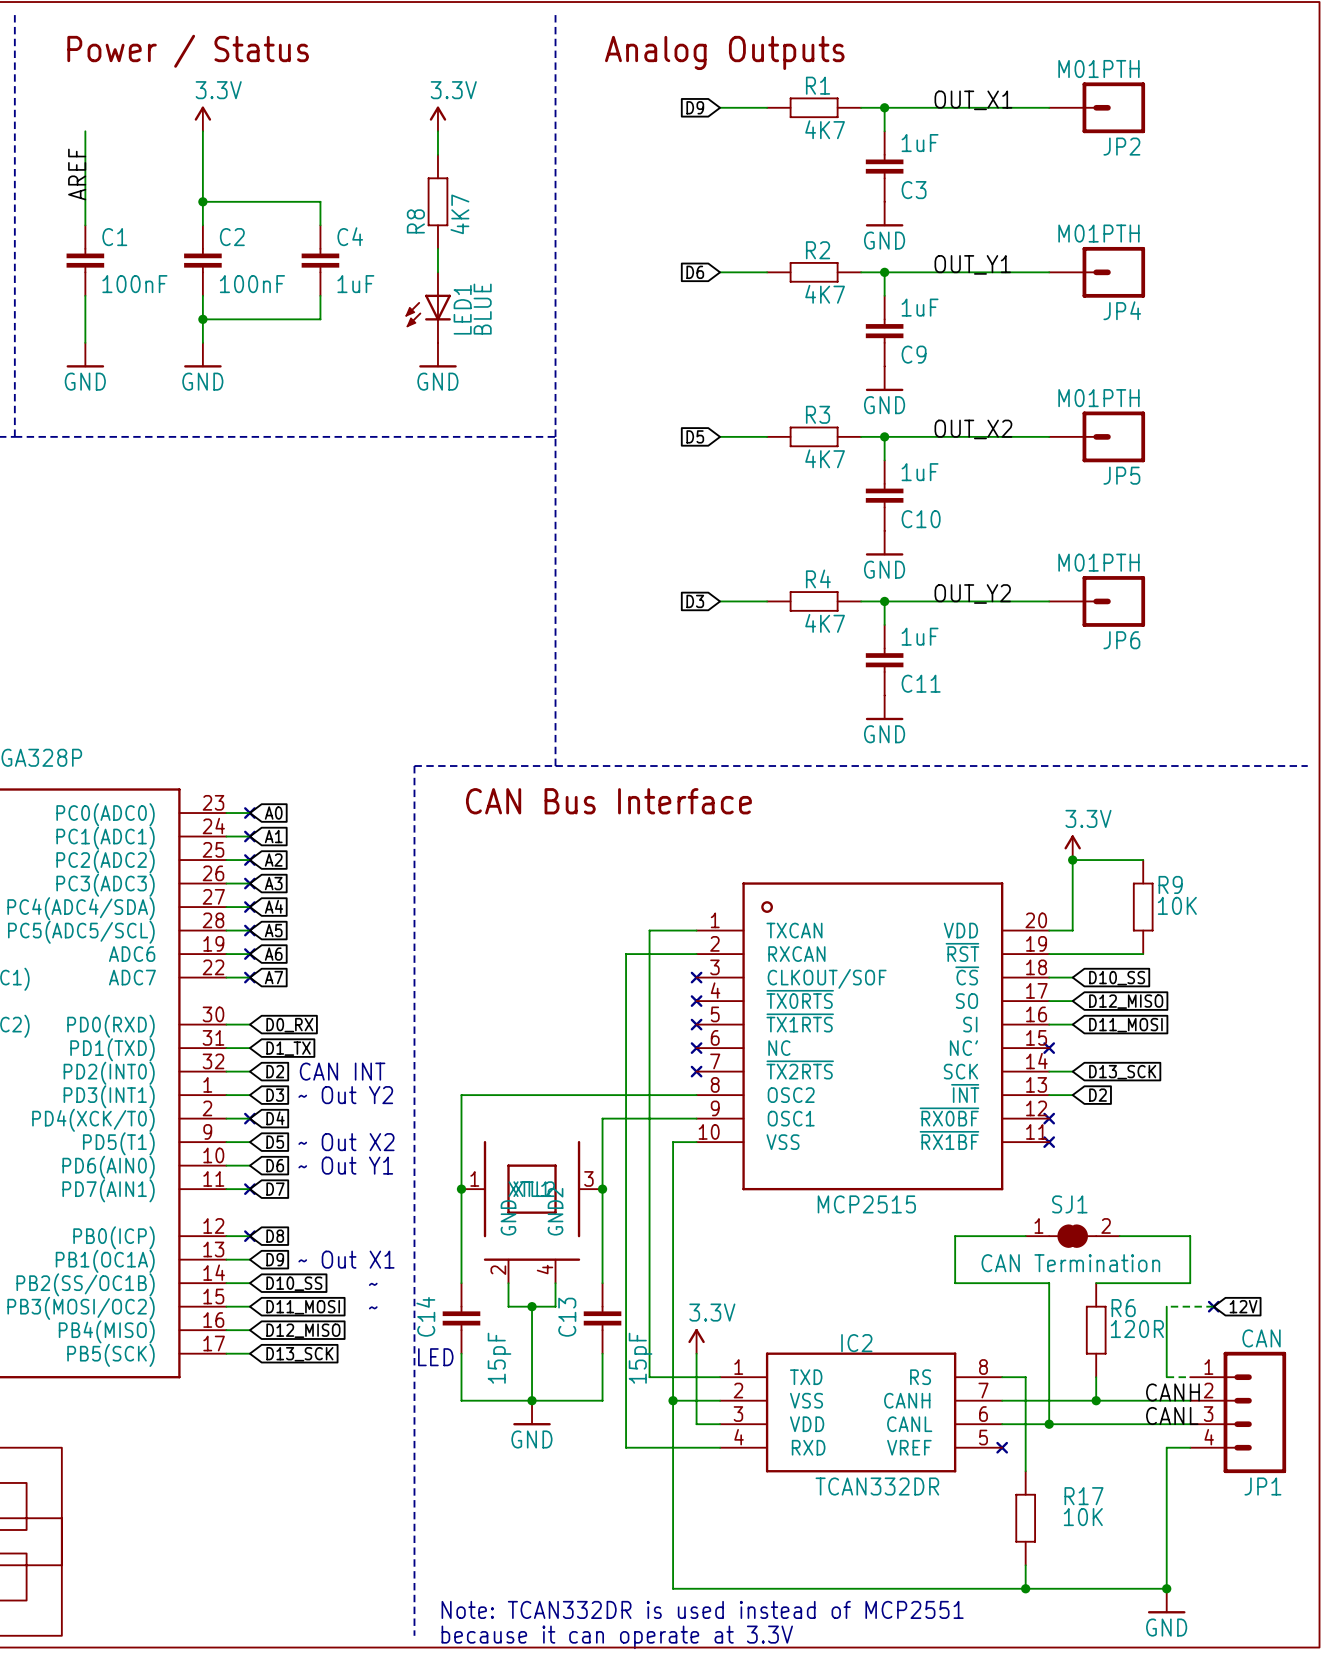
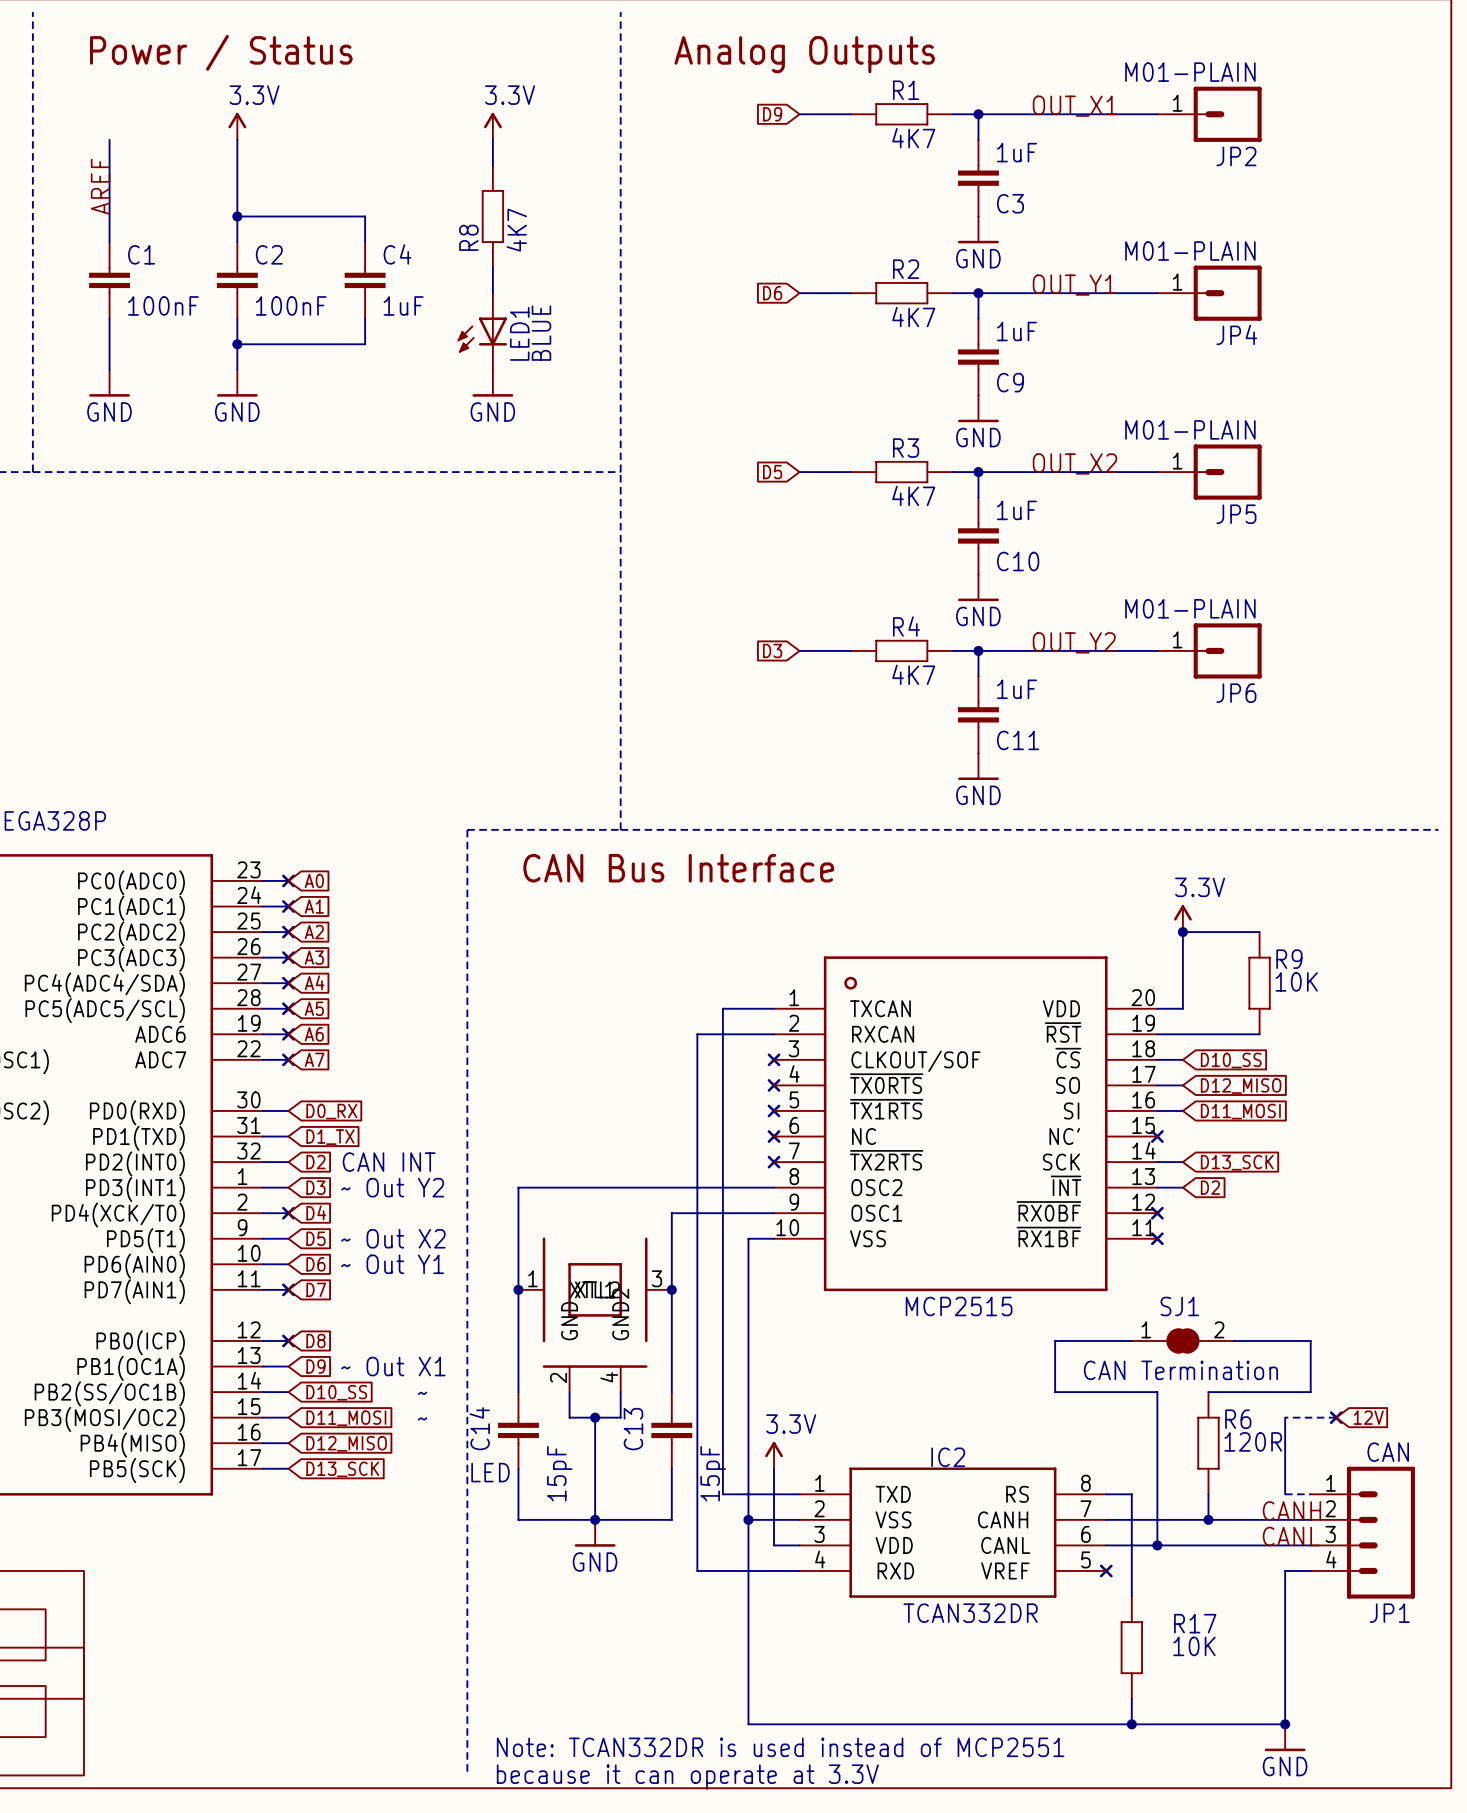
JP2 value: M01PTH (1098, 69) -> M01-PLAIN (1190, 72)
JP2 pin number: none -> 1 (1177, 103)
JP4 value: M01PTH (1098, 233) -> M01-PLAIN (1190, 251)
JP4 pin number: none -> 1 (1177, 282)
JP5 value: M01PTH (1098, 398) -> M01-PLAIN (1190, 429)
JP5 pin number: none -> 1 (1177, 461)
JP6 value: M01PTH (1098, 562) -> M01-PLAIN (1190, 608)
JP6 pin number: none -> 1 (1177, 639)

